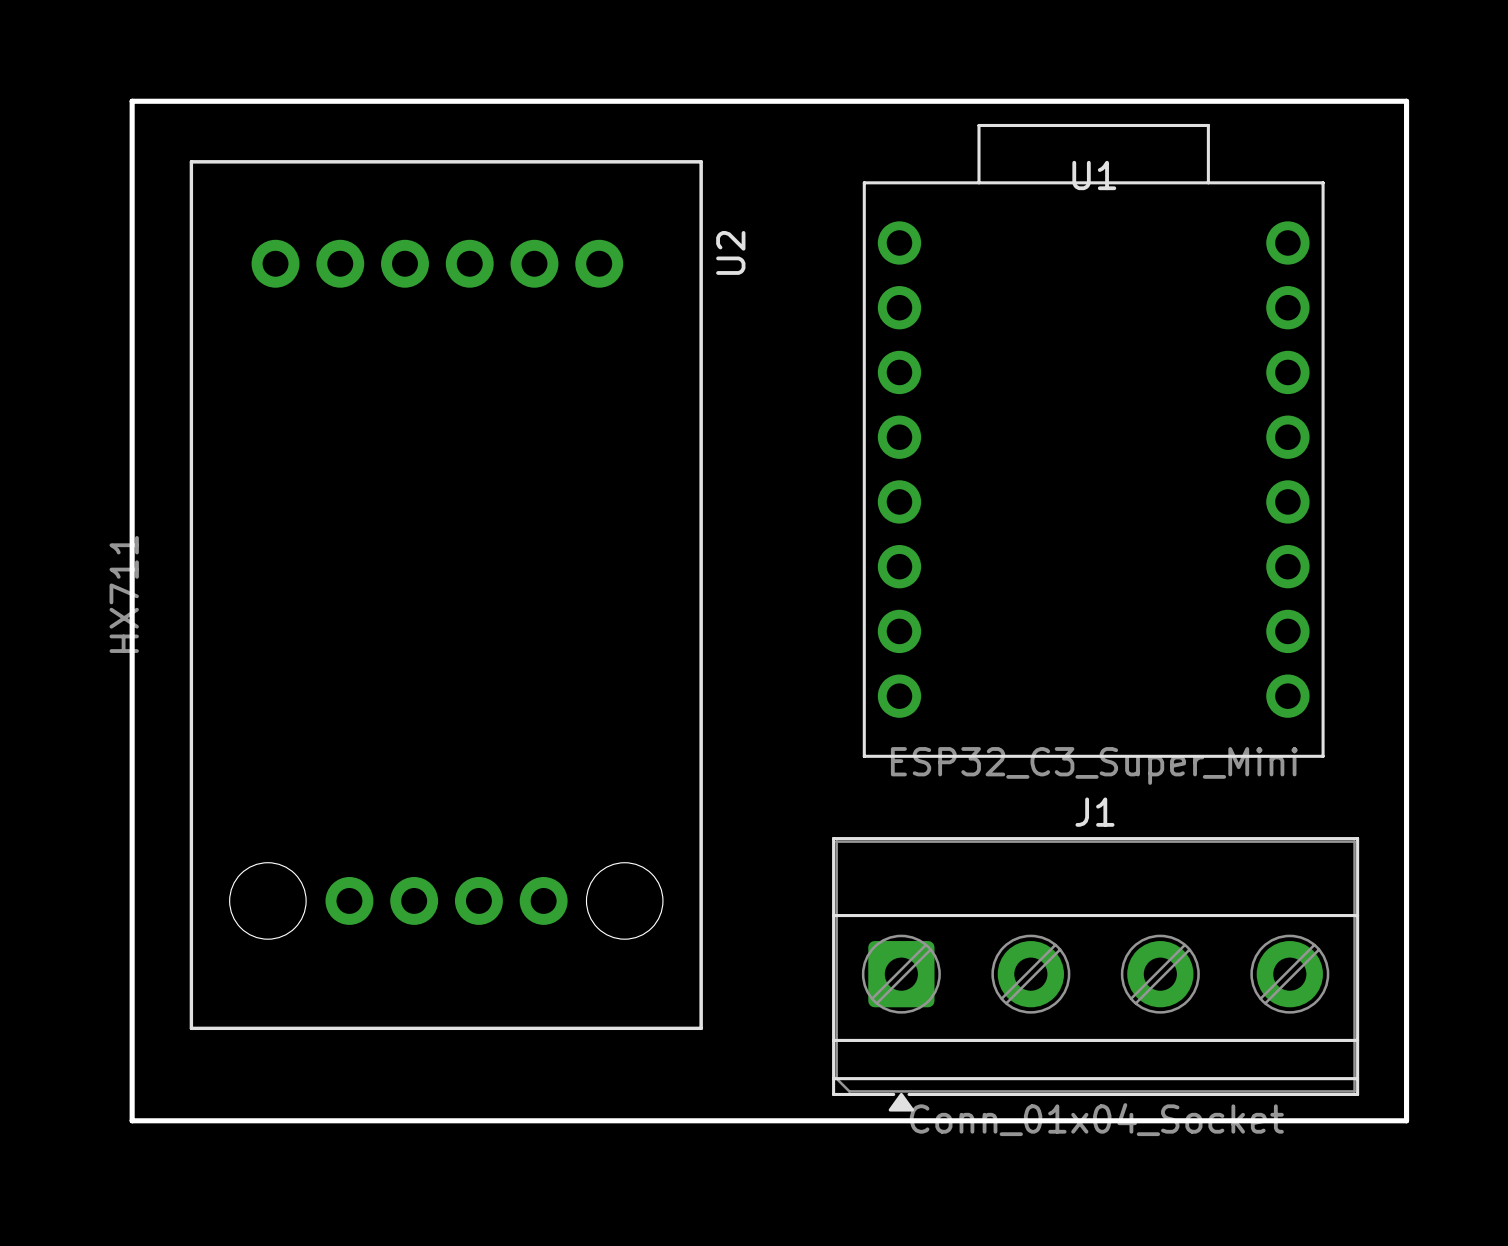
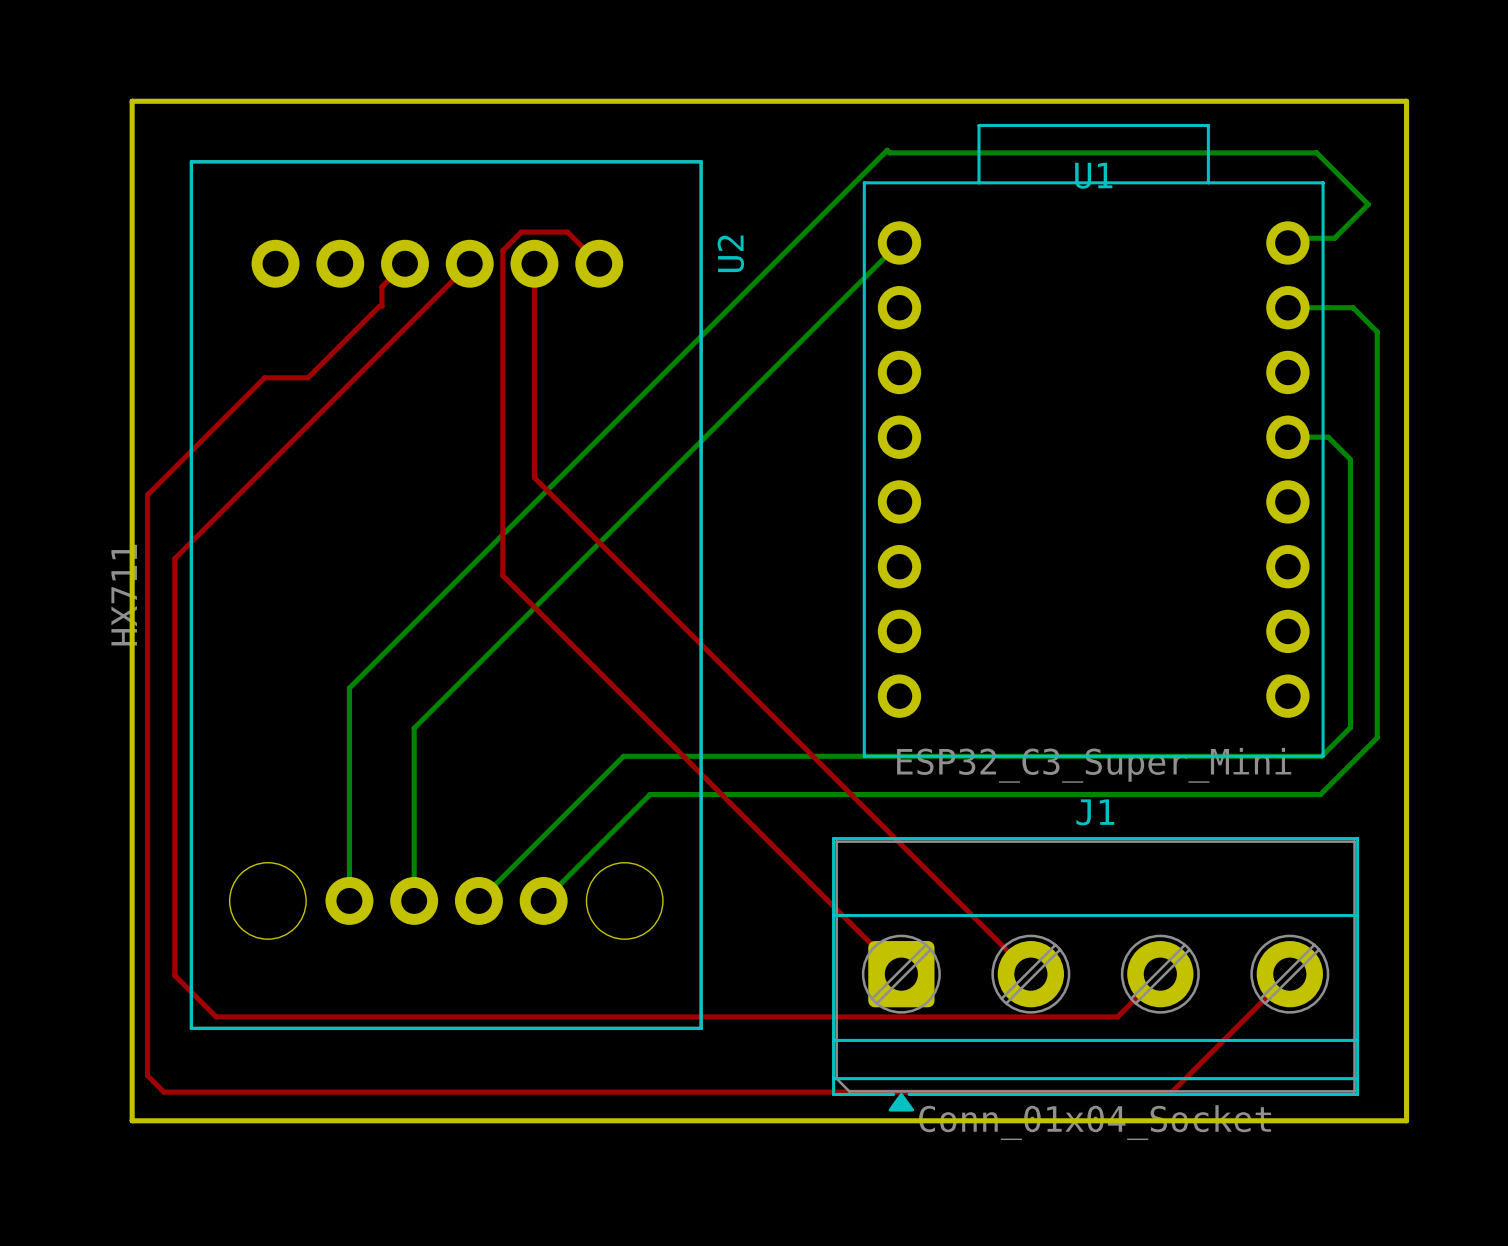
bottom track: none -> (899, 242) (414, 728) (414, 900)
bottom track: none -> (1287, 242) (1292, 238) (1334, 238) (1368, 204) (1316, 152) (889, 152) (887, 150) (349, 688) (349, 900)
top track: none -> (405, 263) (381, 286) (381, 306) (379, 306) (308, 377) (264, 377) (147, 495) (147, 1075) (164, 1092) (1171, 1092) (1289, 974)
top track: none -> (469, 263) (174, 558) (174, 975) (216, 1016) (1117, 1016) (1160, 974)
top track: none -> (534, 263) (534, 477) (1030, 974)
top track: none -> (599, 263) (567, 232) (521, 232) (502, 250) (502, 575) (901, 974)
bottom track: none -> (1287, 307) (1353, 307) (1377, 331) (1377, 737) (1320, 794) (650, 794) (543, 900)
bottom track: none -> (1287, 437) (1328, 437) (1350, 459) (1350, 727) (1321, 756) (623, 756) (478, 900)

